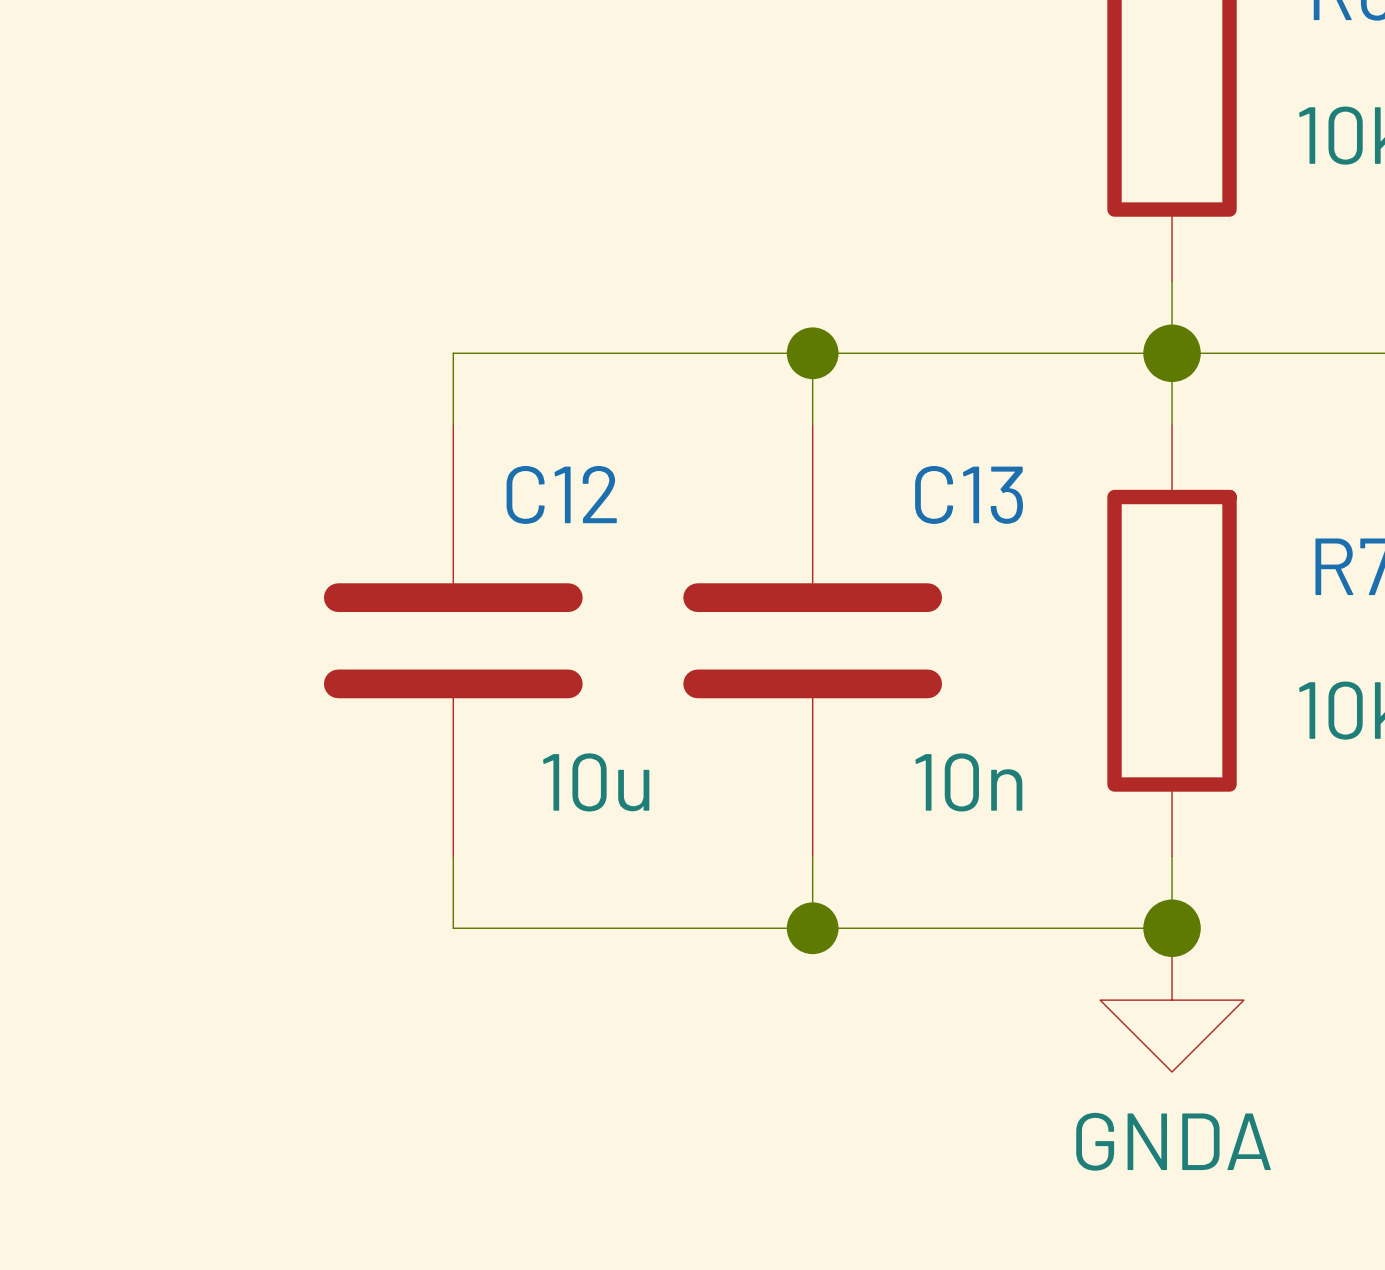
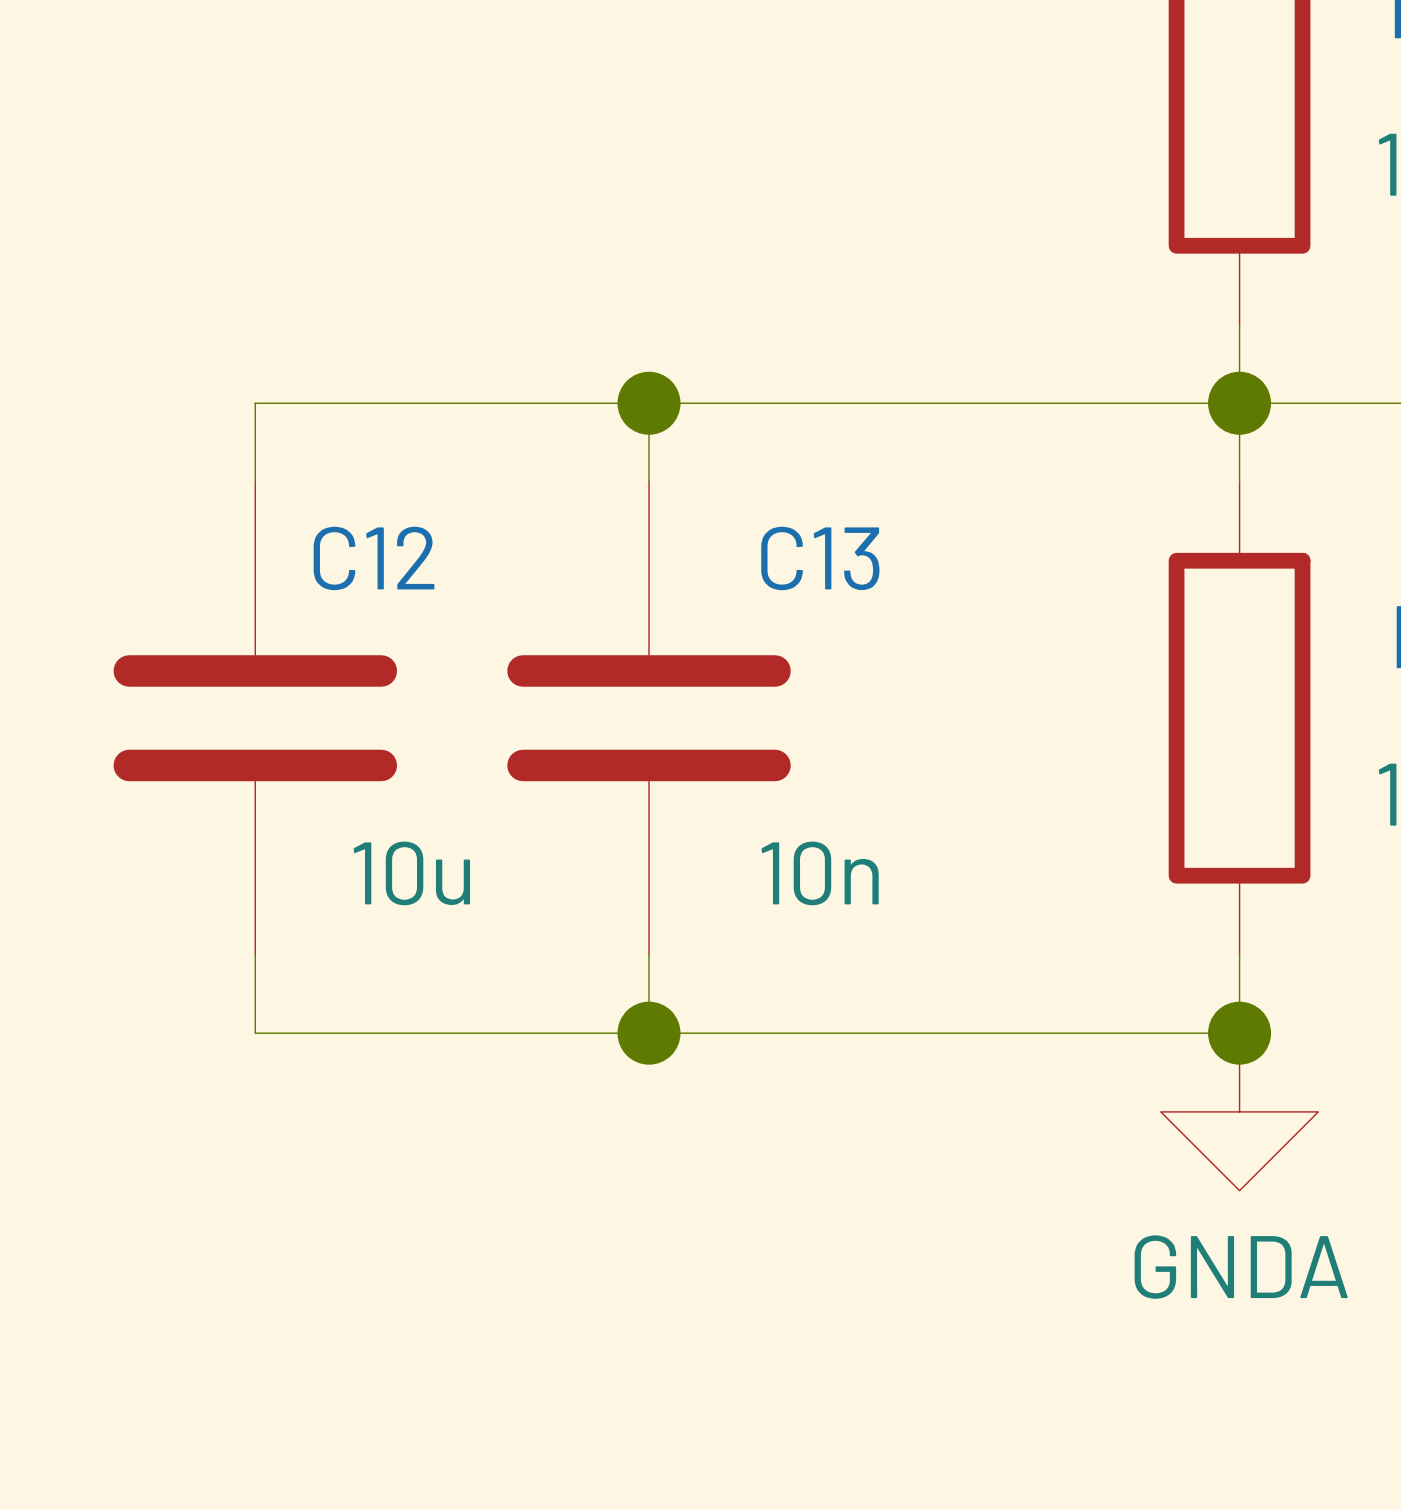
wire: (453, 353) (453, 425) -> (452, 403) (255, 403) (255, 481)
junction: none -> (649, 403)
wire: (812, 353) (812, 425) -> (649, 403) (649, 481)
junction: (812, 353) -> none
C12 position: (453, 640) -> (255, 718)
C13 position: (812, 640) -> (649, 718)
wire: (453, 856) (453, 928) -> (255, 954) (255, 1033) (452, 1033)
wire: (812, 856) (812, 928) -> (649, 954) (649, 1033)
junction: none -> (649, 1033)
junction: (812, 928) -> none

